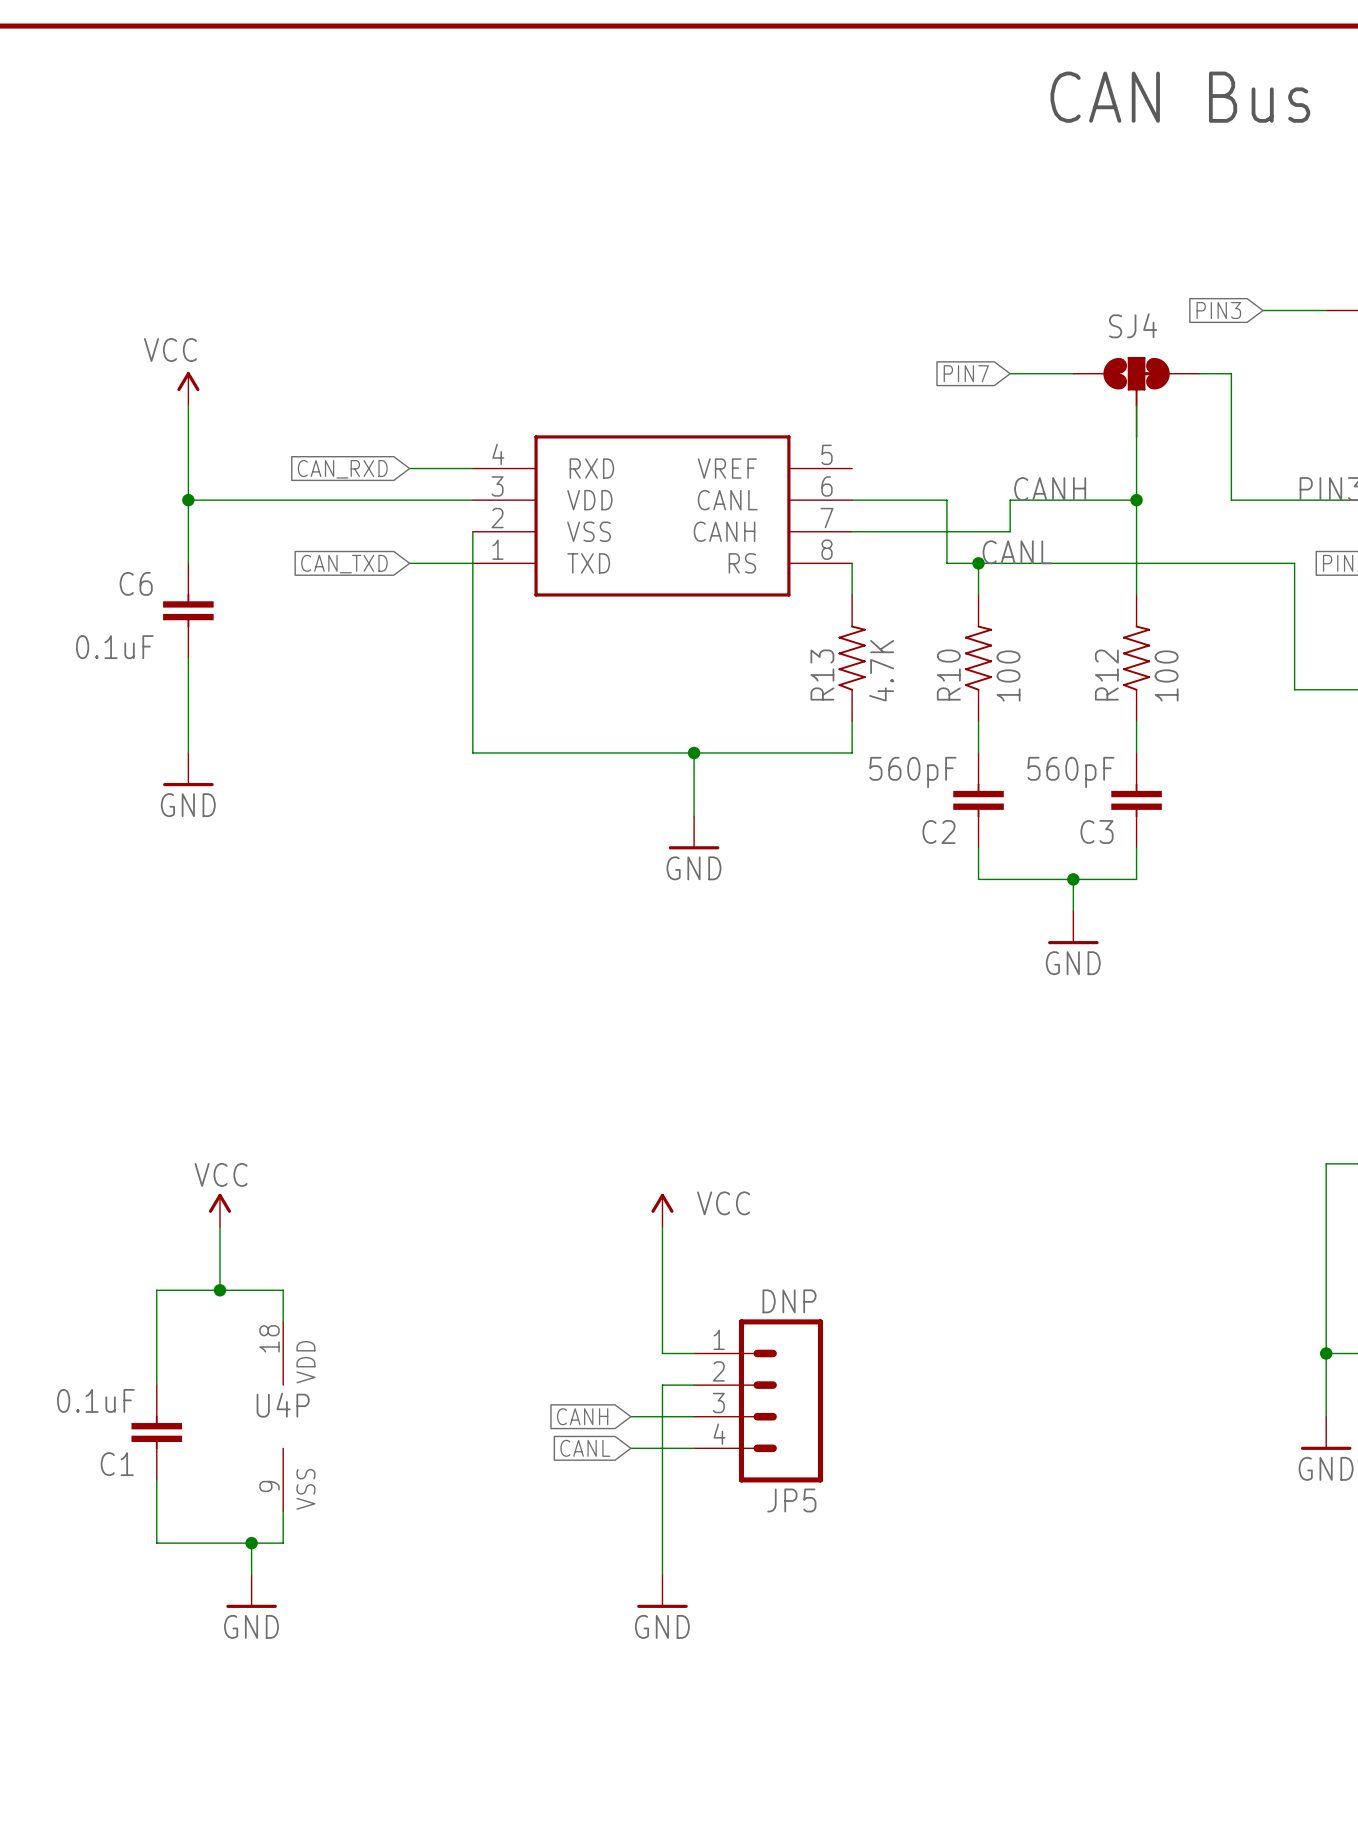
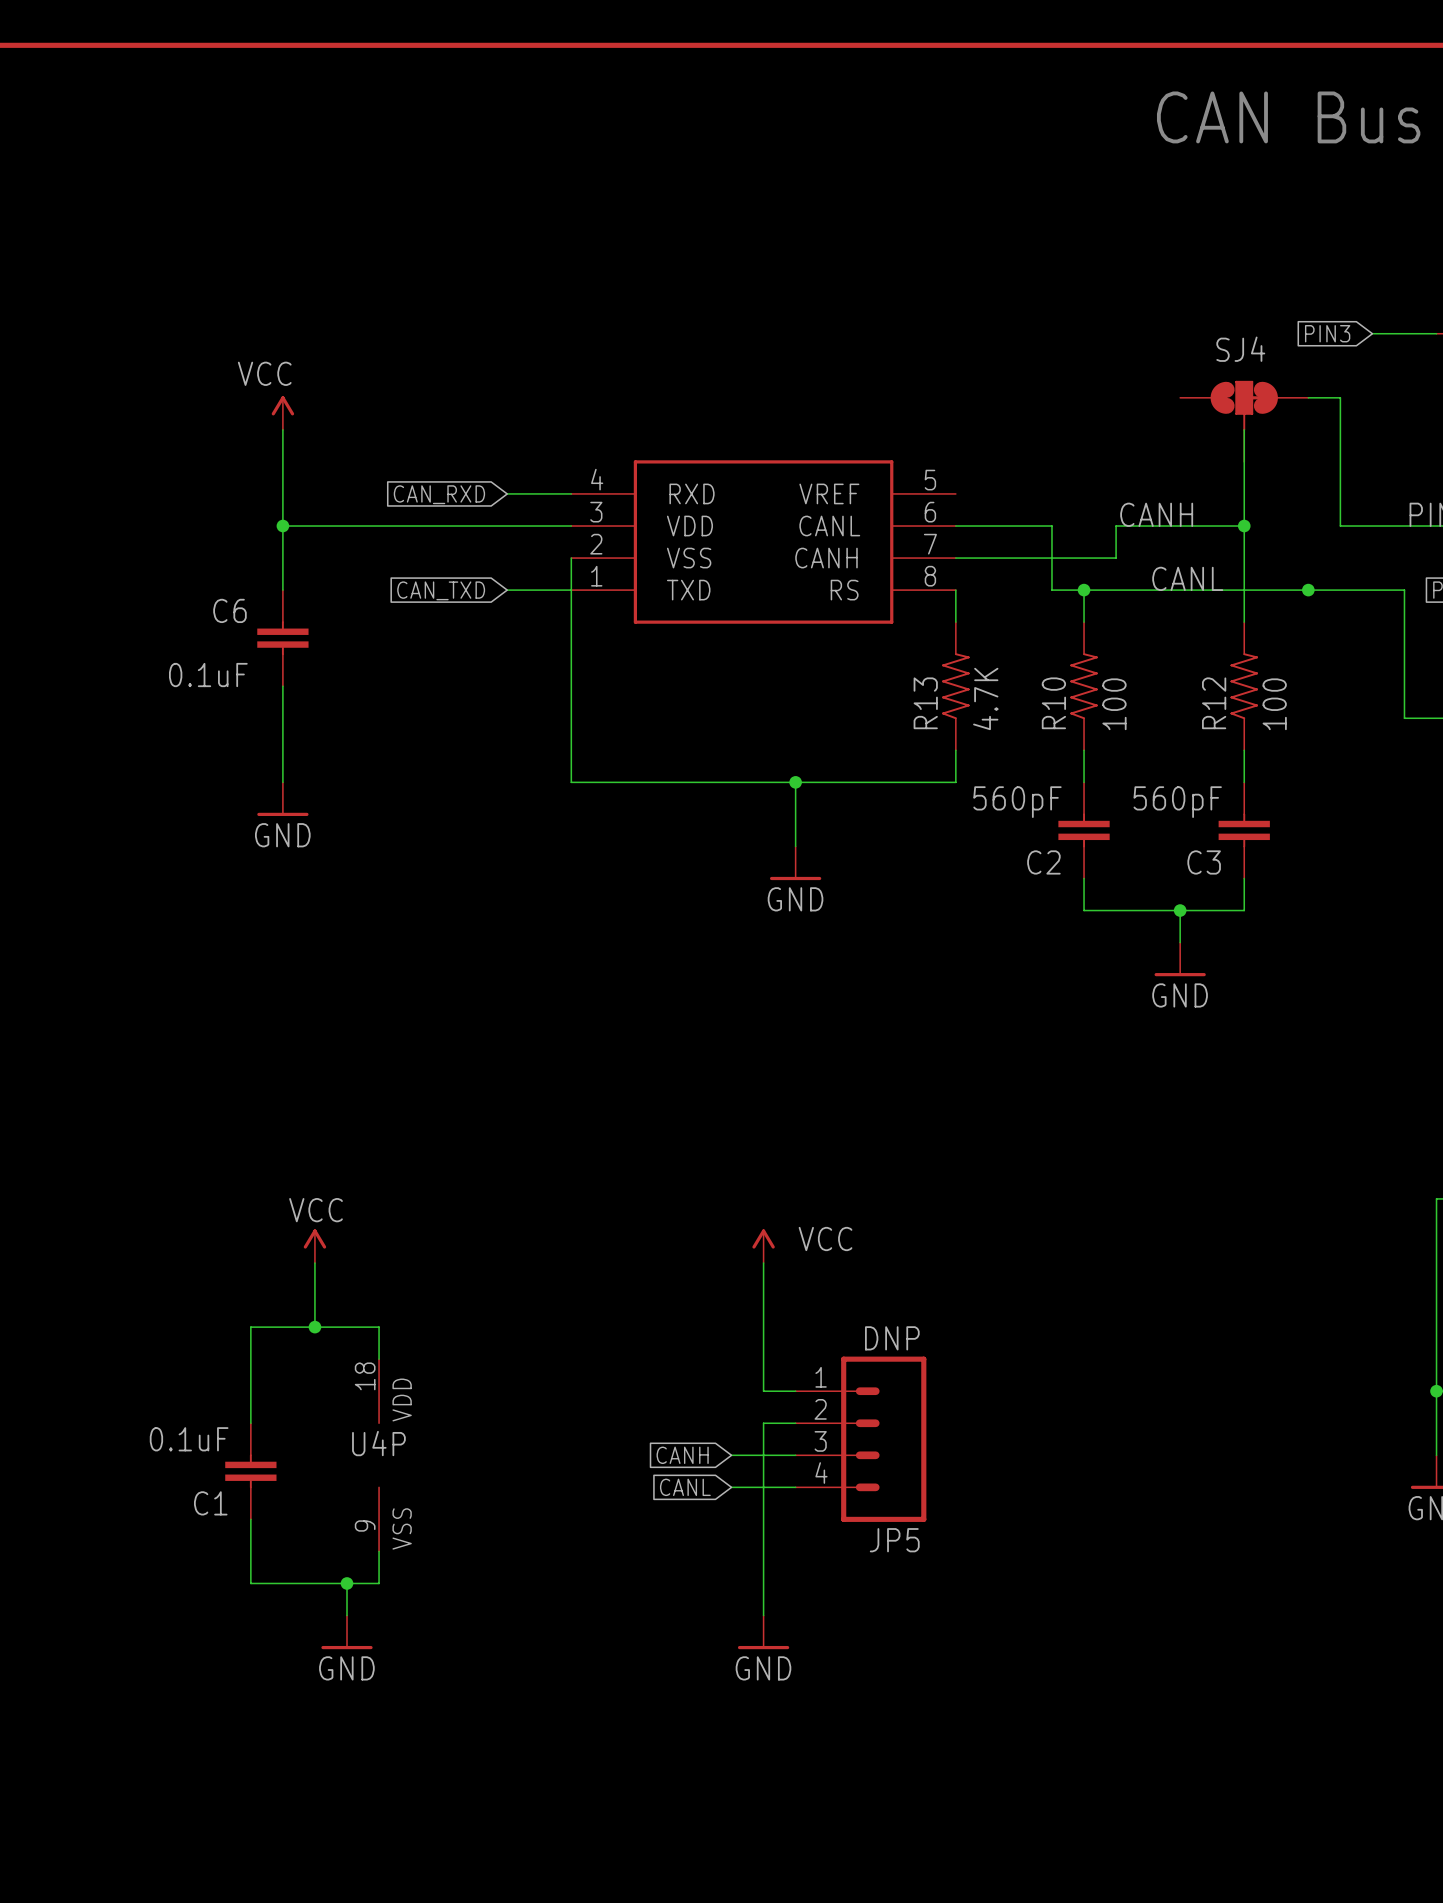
global label: PIN7 (966, 373) -> none
wire: (1010, 373) (1073, 373) -> none
label position: CANL (1017, 552) -> CANL (1187, 578)
junction: none -> (1308, 590)

